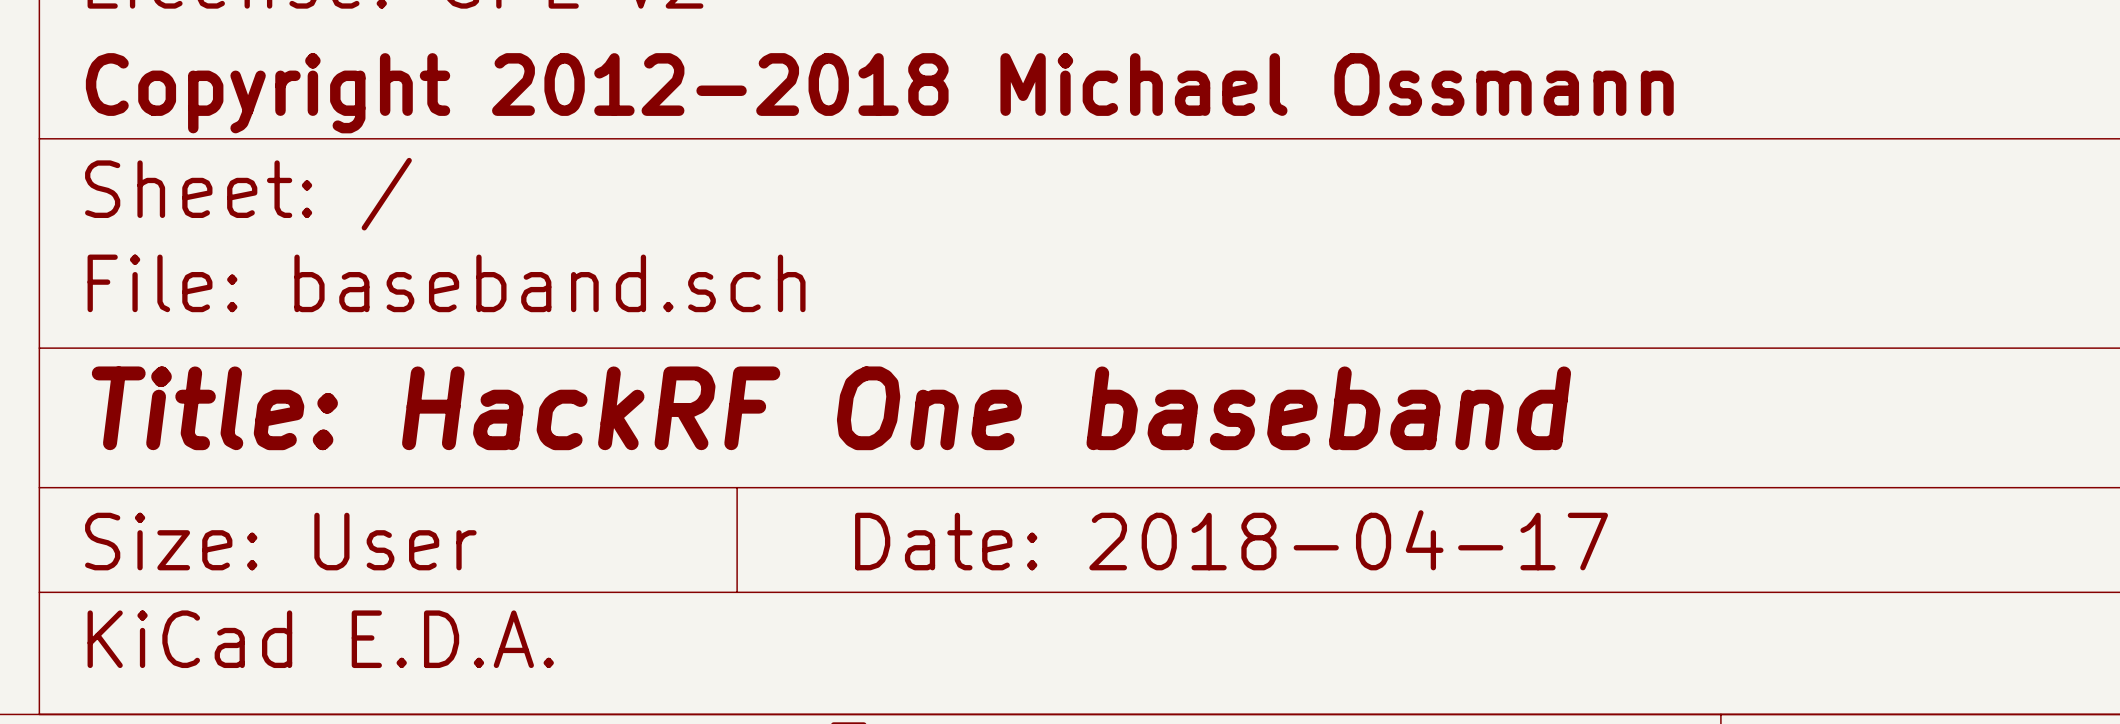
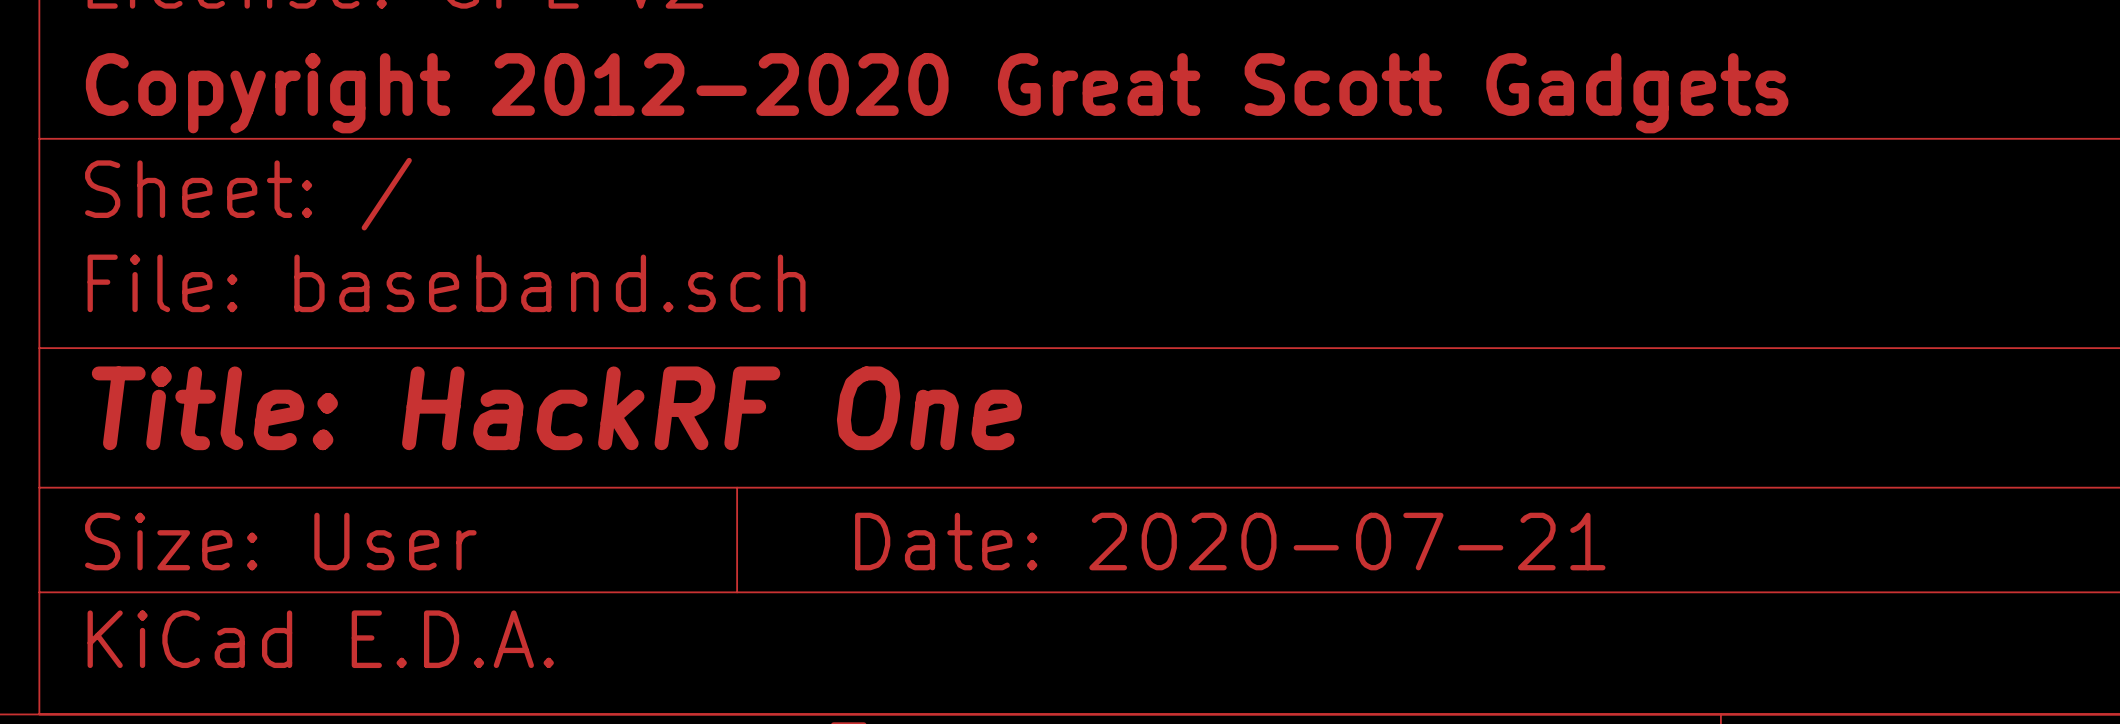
title block: Copyright 2012-2018 Michael Ossmann (879, 93) -> Copyright 2012-2020 Great Scott Gadgets (937, 93)
title block: Title: HackRF One baseband (831, 408) -> Title: HackRF One (556, 408)
title block: Date: 2018-04-17 (1231, 540) -> Date: 2020-07-21 (1230, 541)

